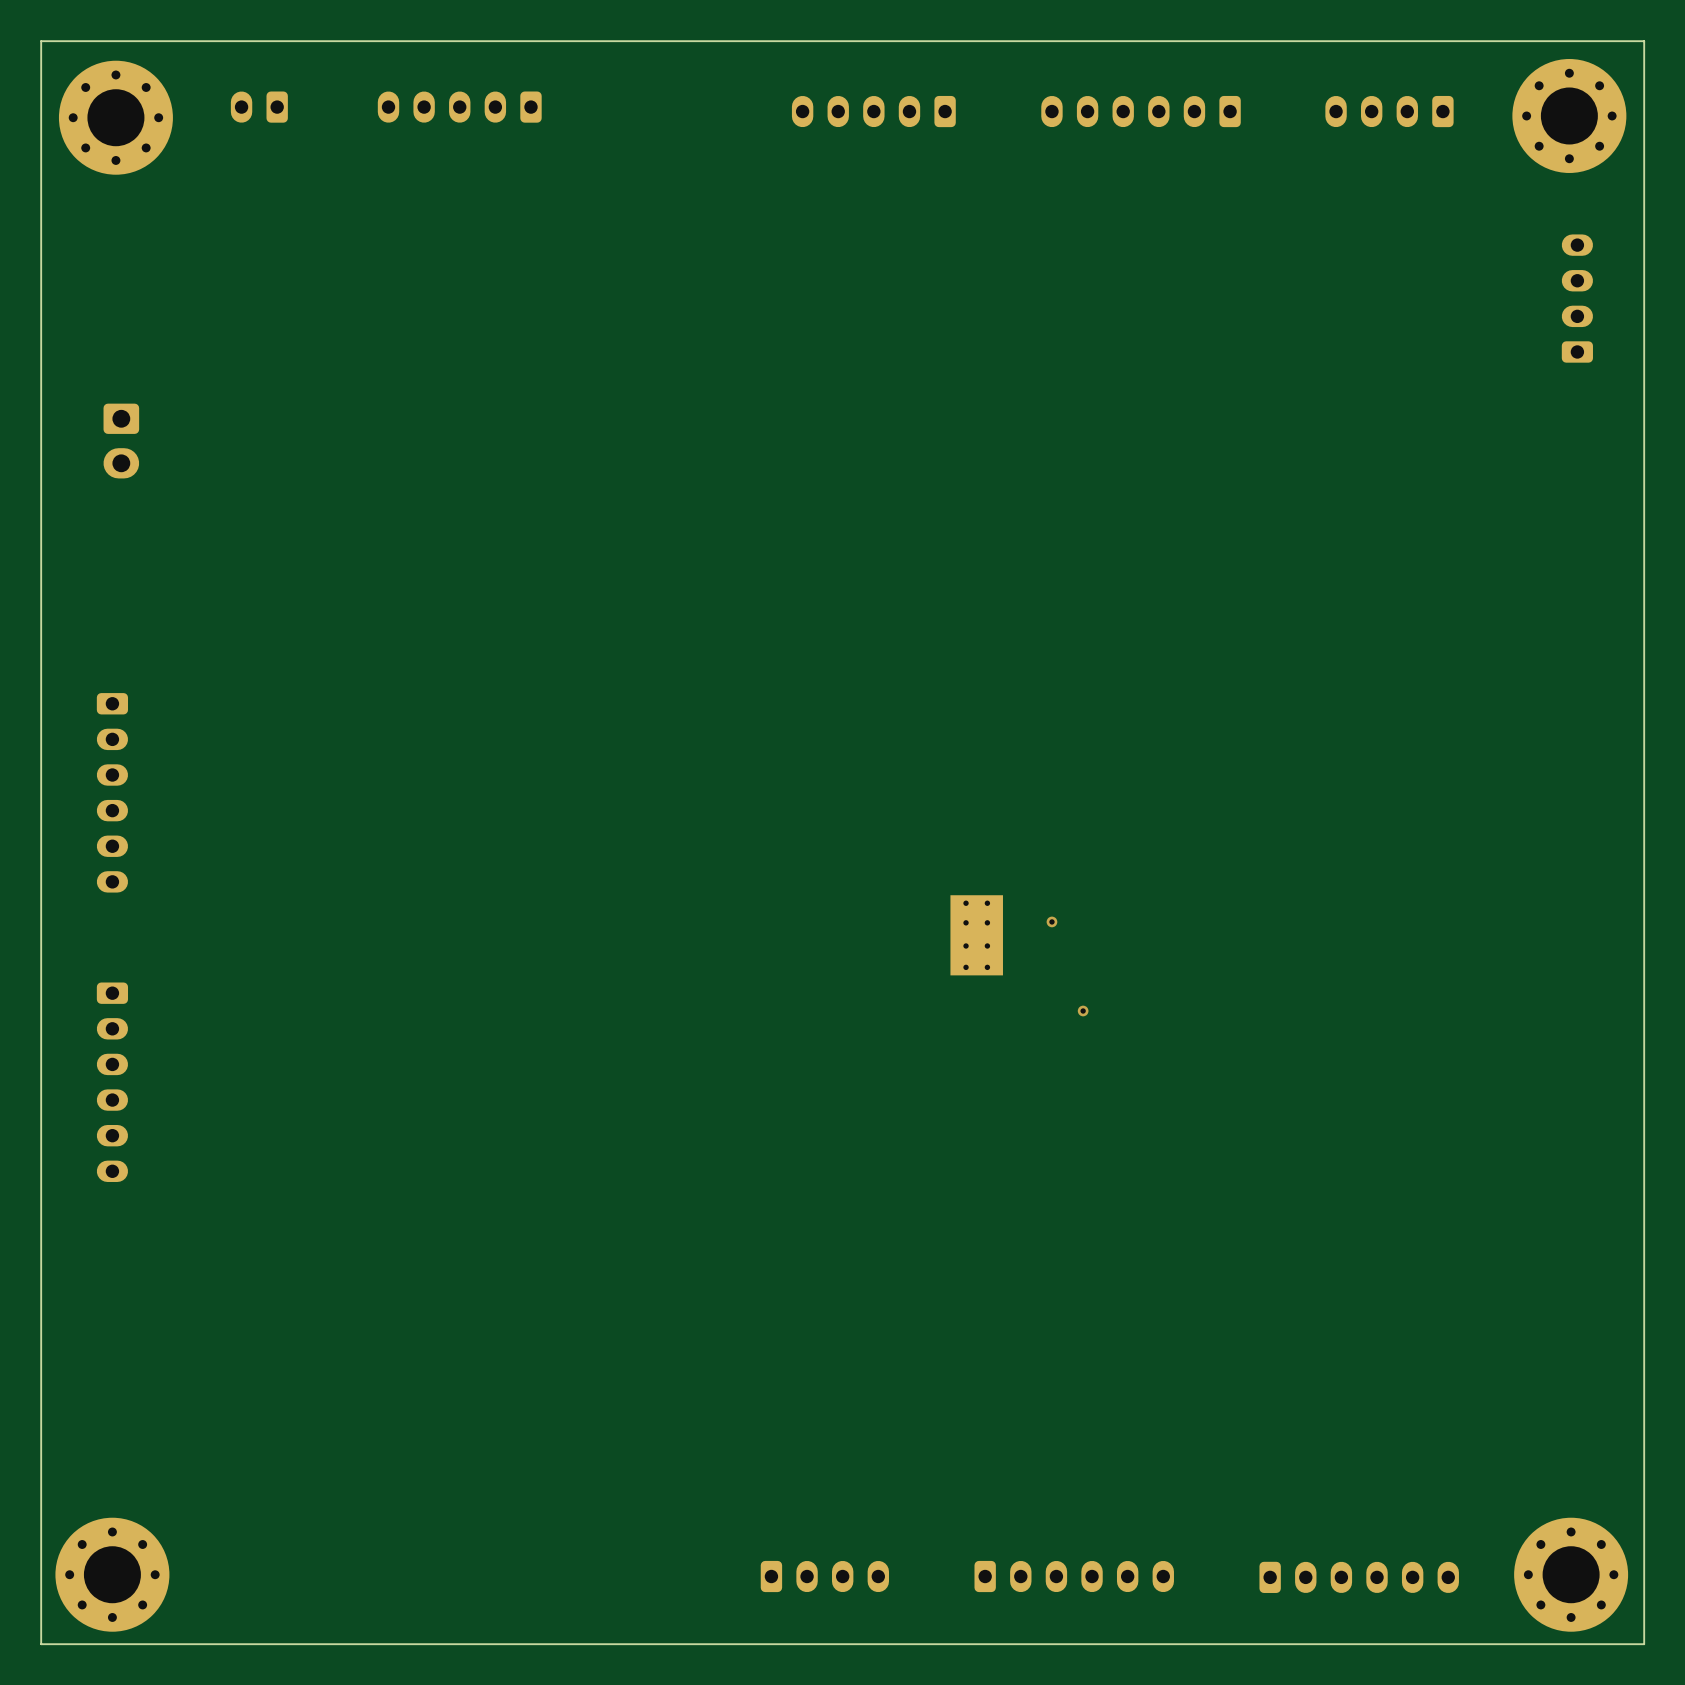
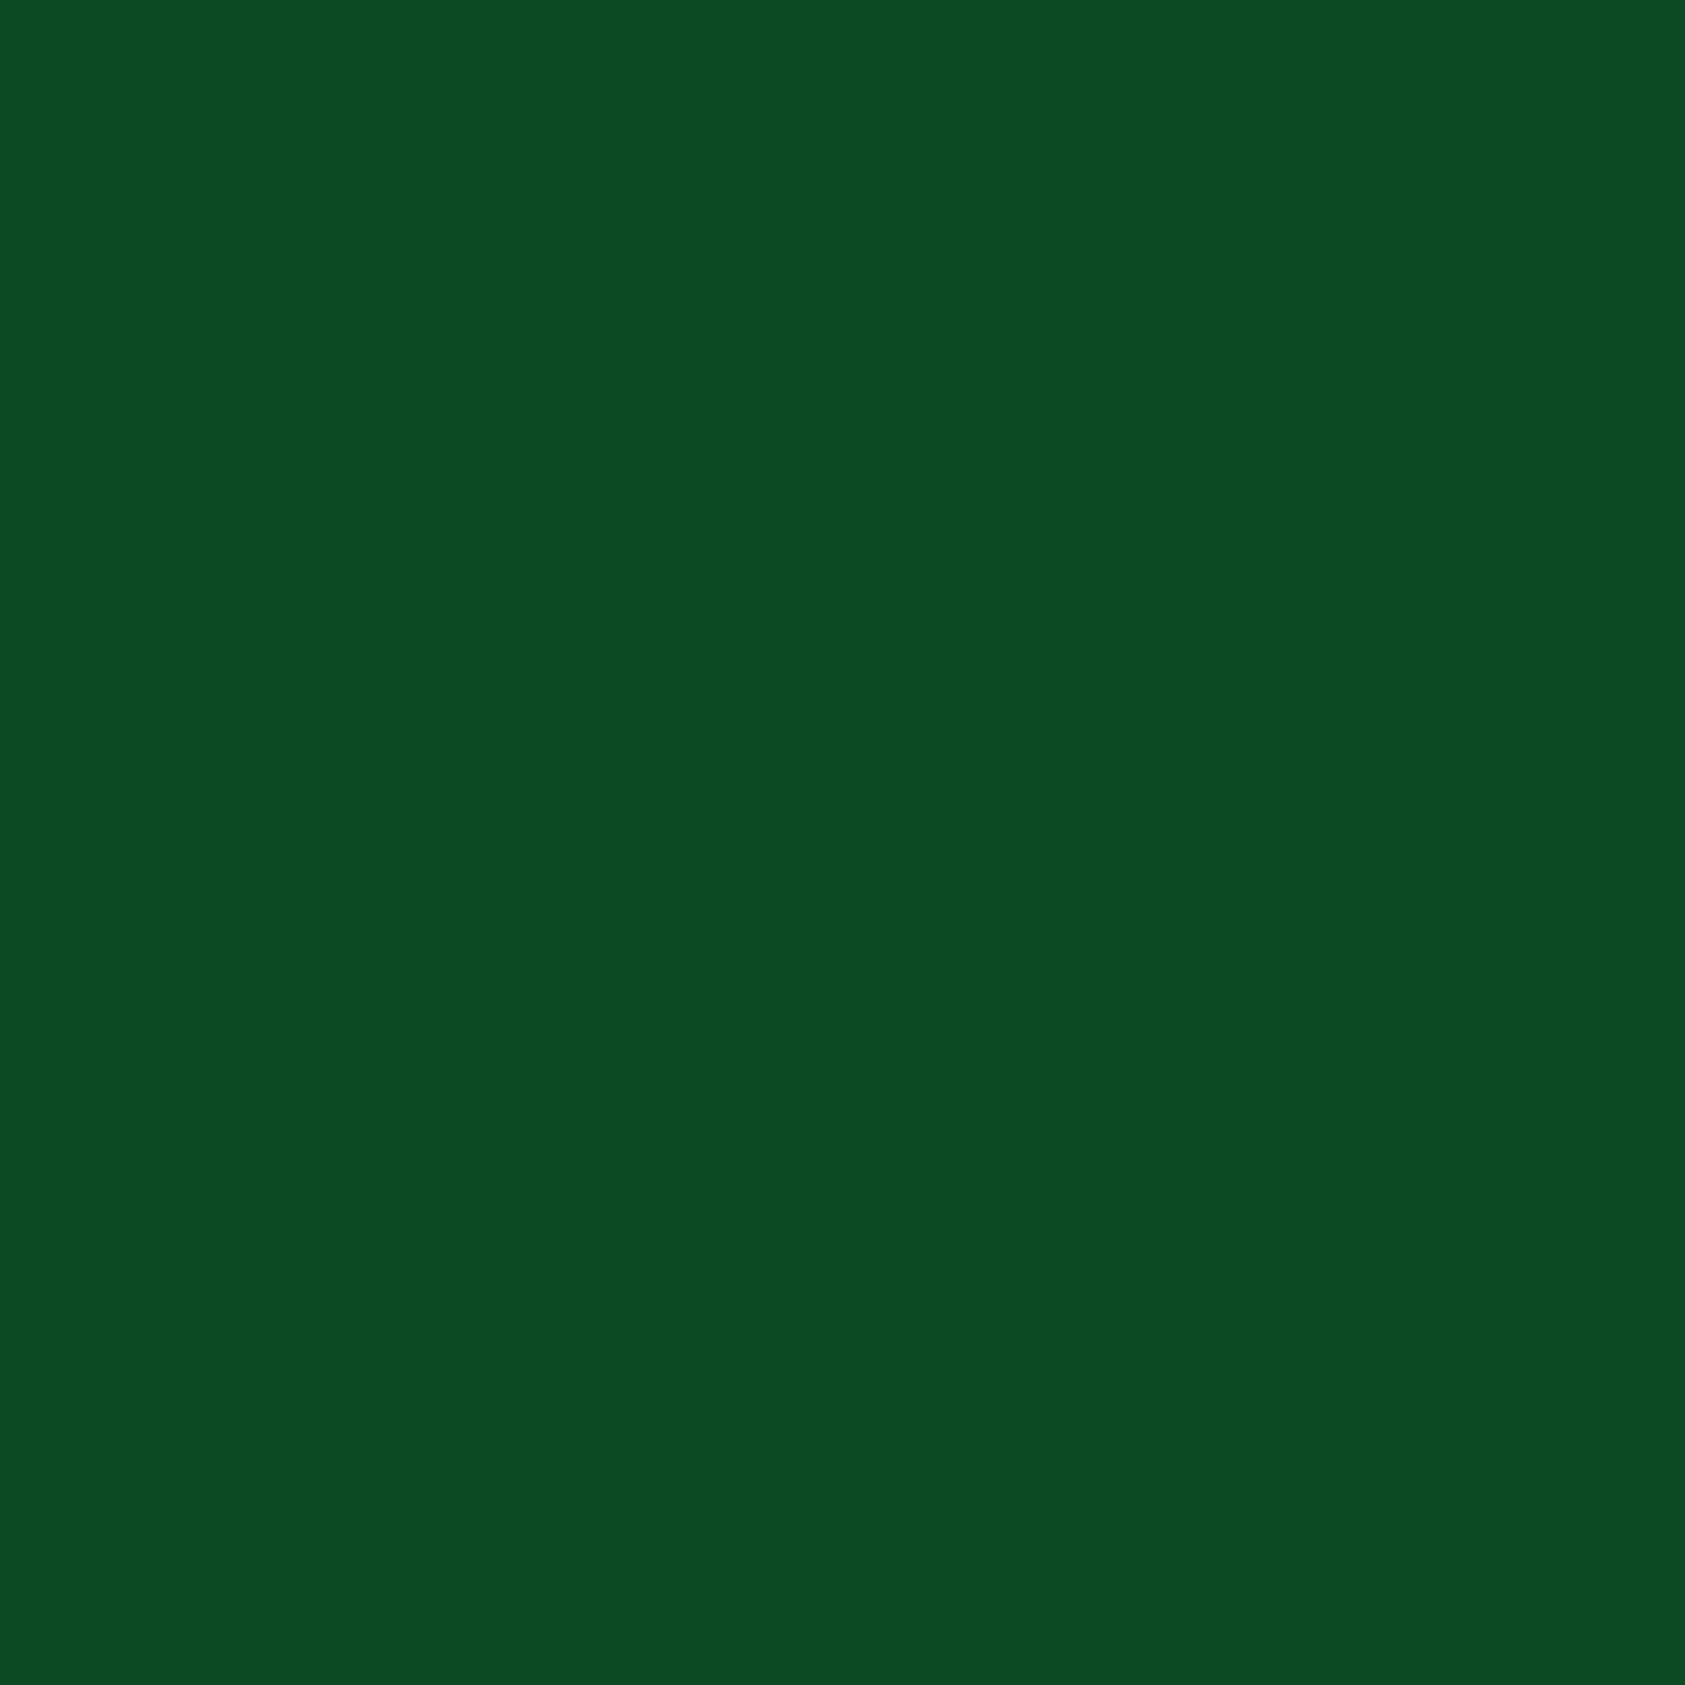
board edge: (1644, 41) (41, 41) (41, 1644) (1644, 1644) (1644, 41) -> none
part: (259, 107) -> none
part: (459, 107) -> none
part: (873, 111) -> none
part: (1141, 111) -> none
part: (1389, 111) -> none
part: (1569, 115) -> none
part: (115, 117) -> none
part: (1577, 298) -> none
part: (121, 441) -> none
part: (112, 792) -> none
via: (1051, 921) -> none
part: (976, 935) -> none
via: (1083, 1011) -> none
part: (112, 1082) -> none
part: (112, 1574) -> none
part: (1571, 1574) -> none
part: (824, 1576) -> none
part: (1074, 1576) -> none
part: (1359, 1577) -> none

